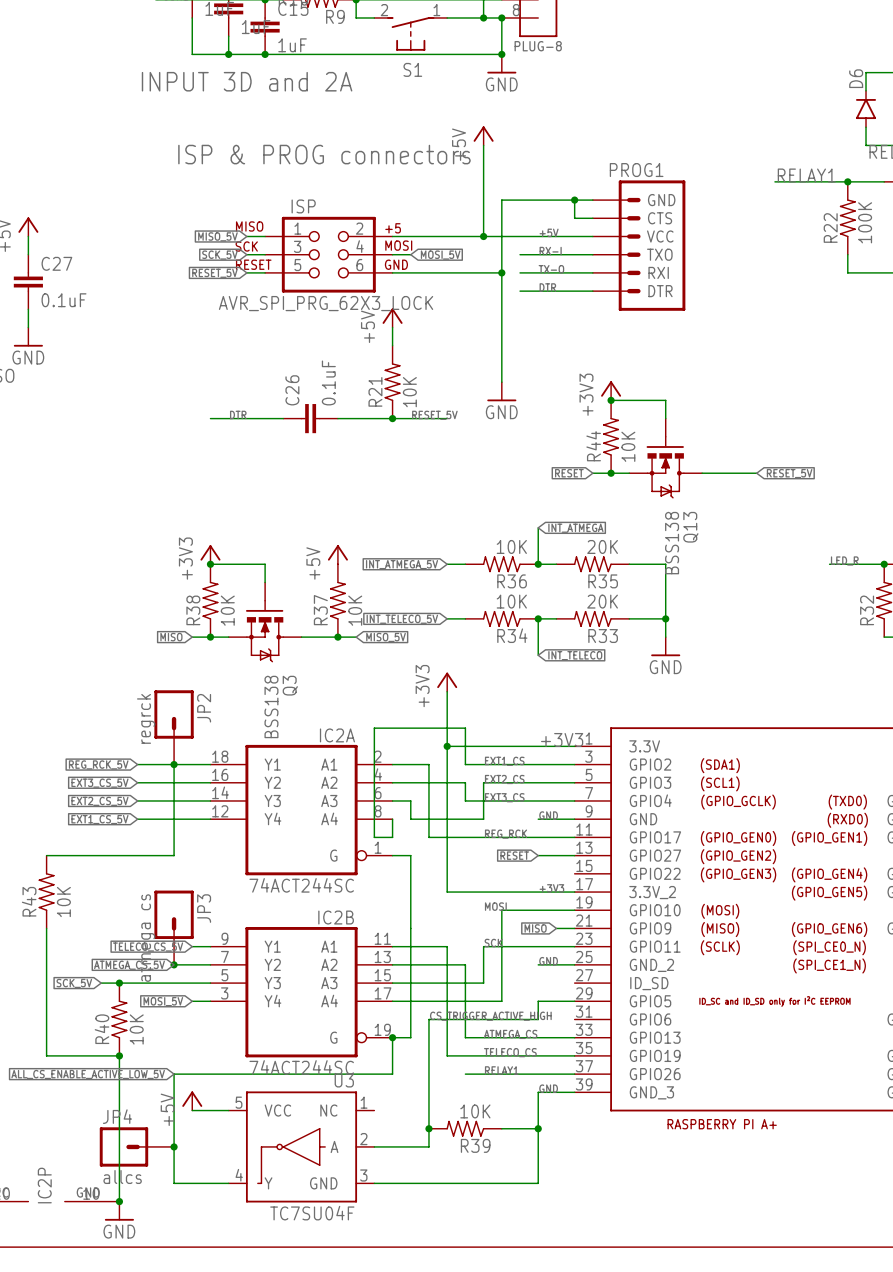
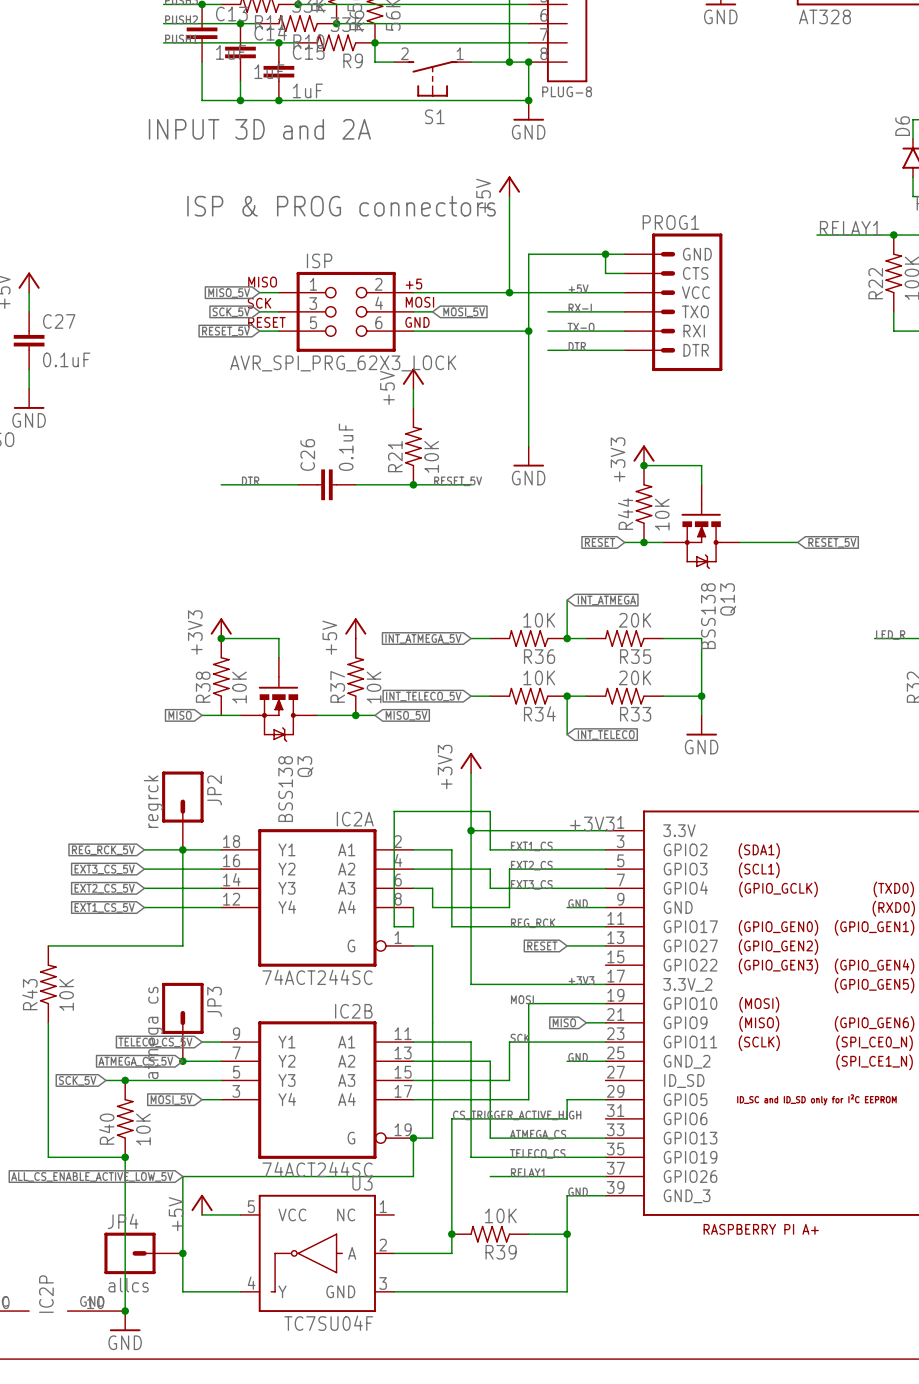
junction: (210, 637) -> none

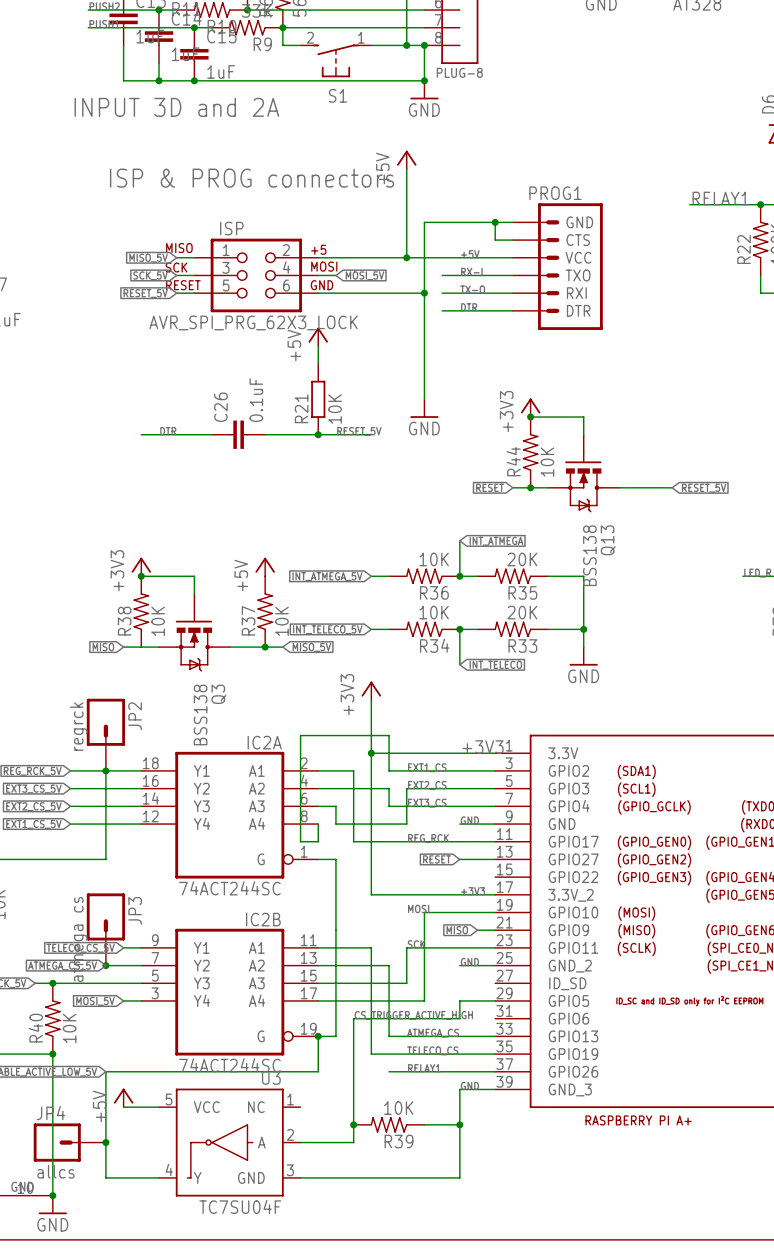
R21 symbol: [405, 407, 422, 485] -> [311, 363, 326, 435]

